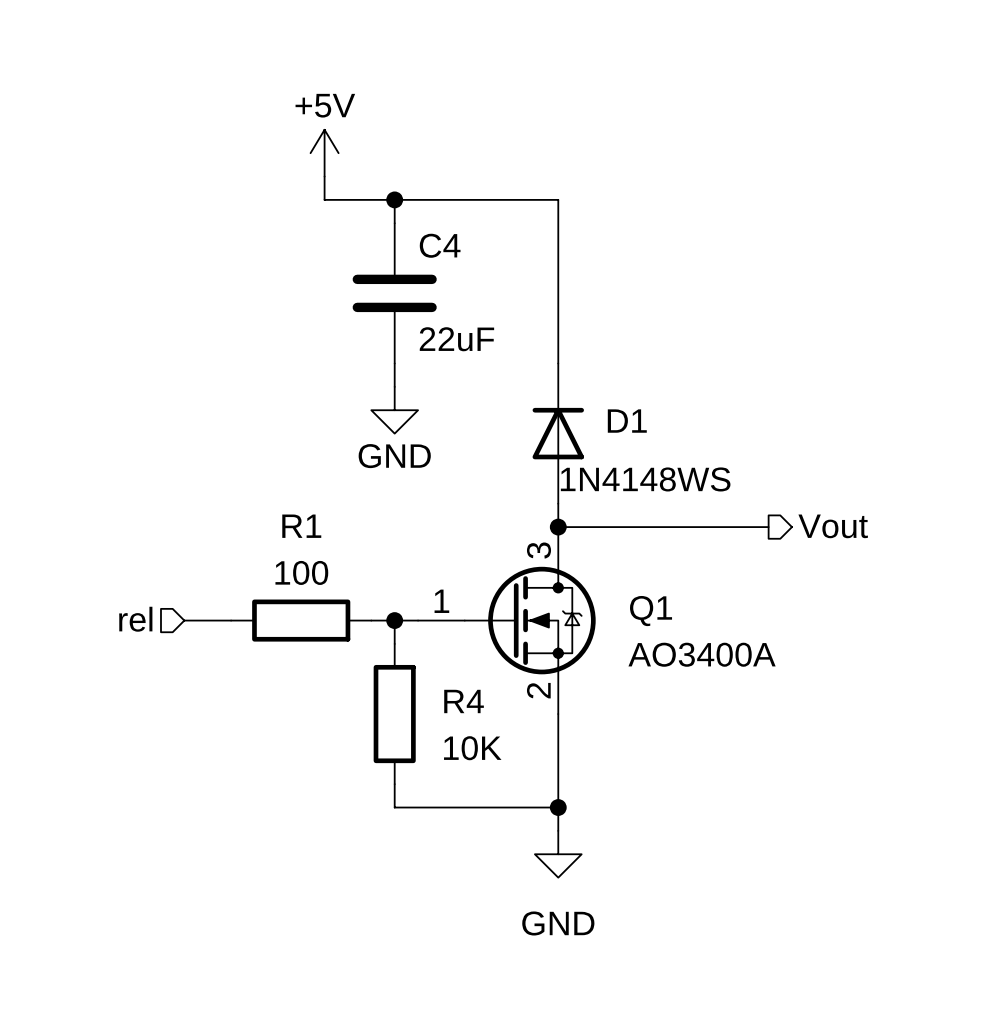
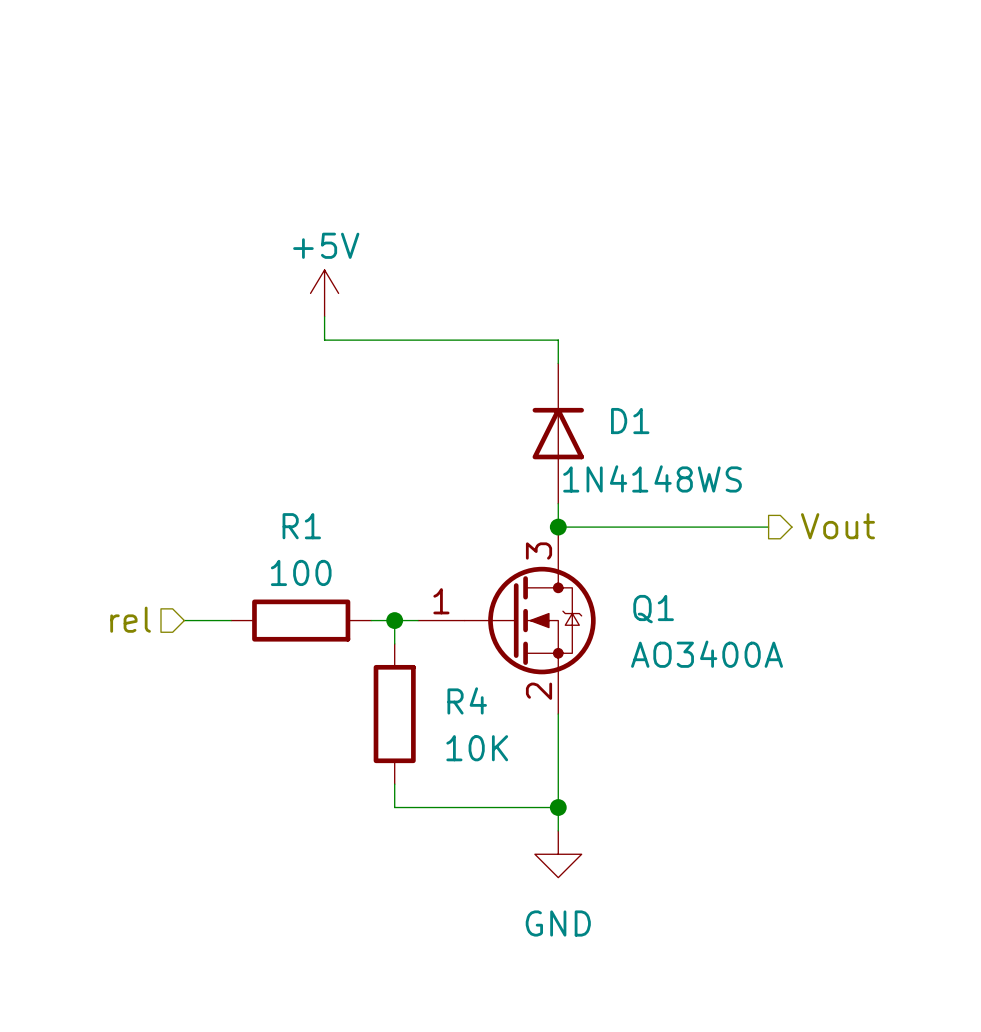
power symbol position: +5V (324, 153) -> +5V (324, 293)
wire: (324, 176) (324, 199) (558, 199) (558, 340) -> (324, 316) (324, 340) (558, 340)
wire: (394, 199) (394, 223) -> none
junction: (394, 199) -> none
C4: 22uF (394, 293) -> none
wire: (394, 363) (394, 386) -> none
power symbol: GND (394, 410) -> none

